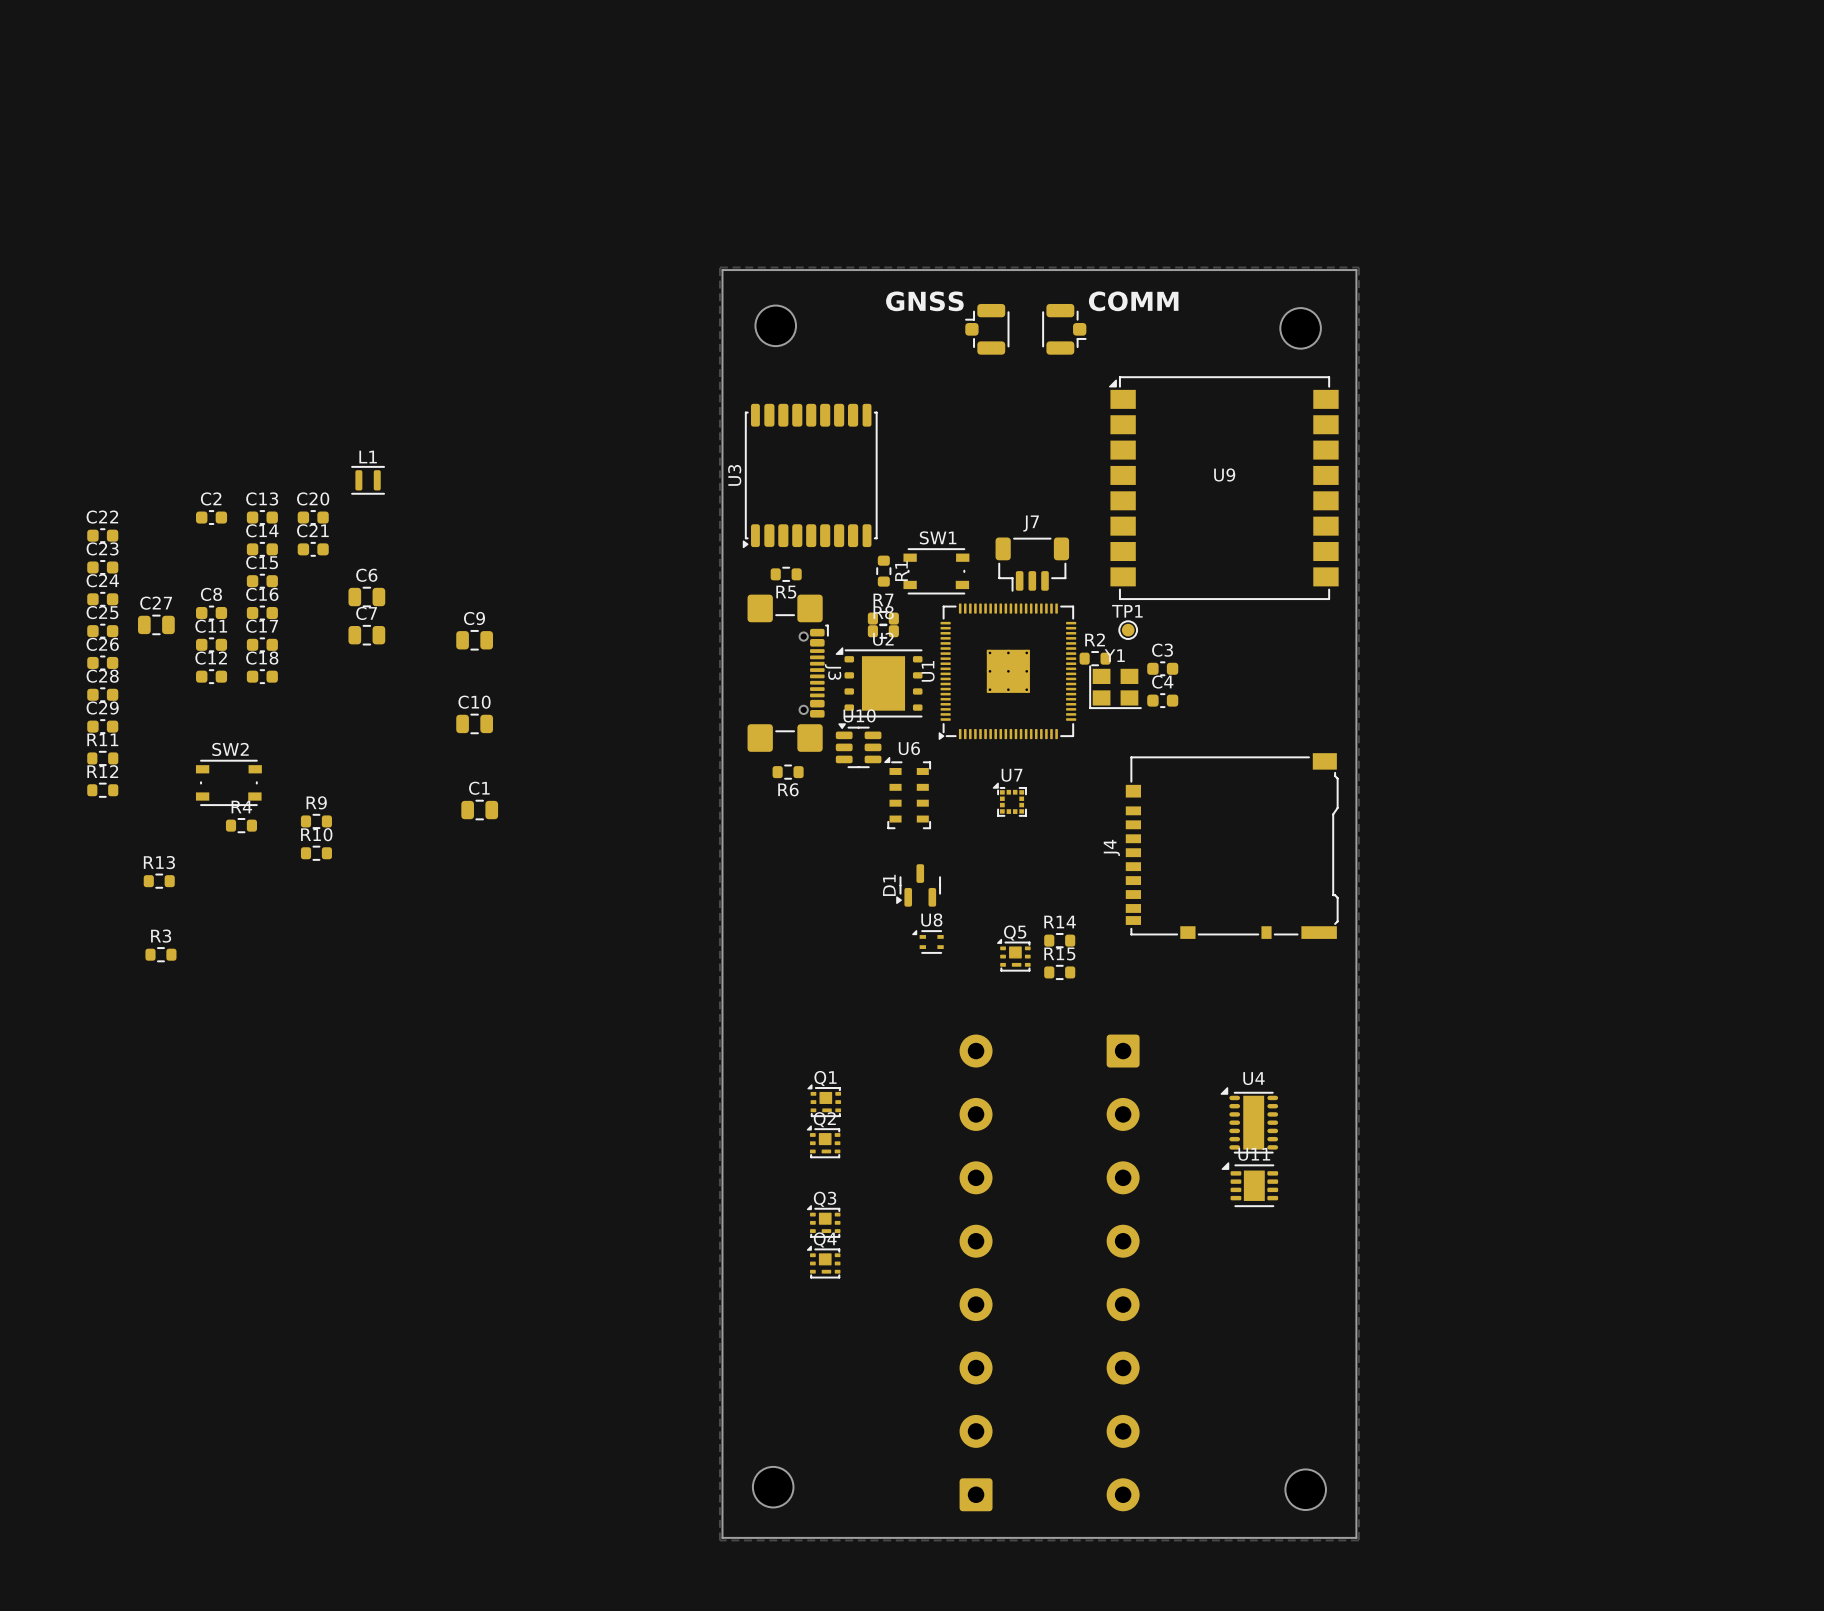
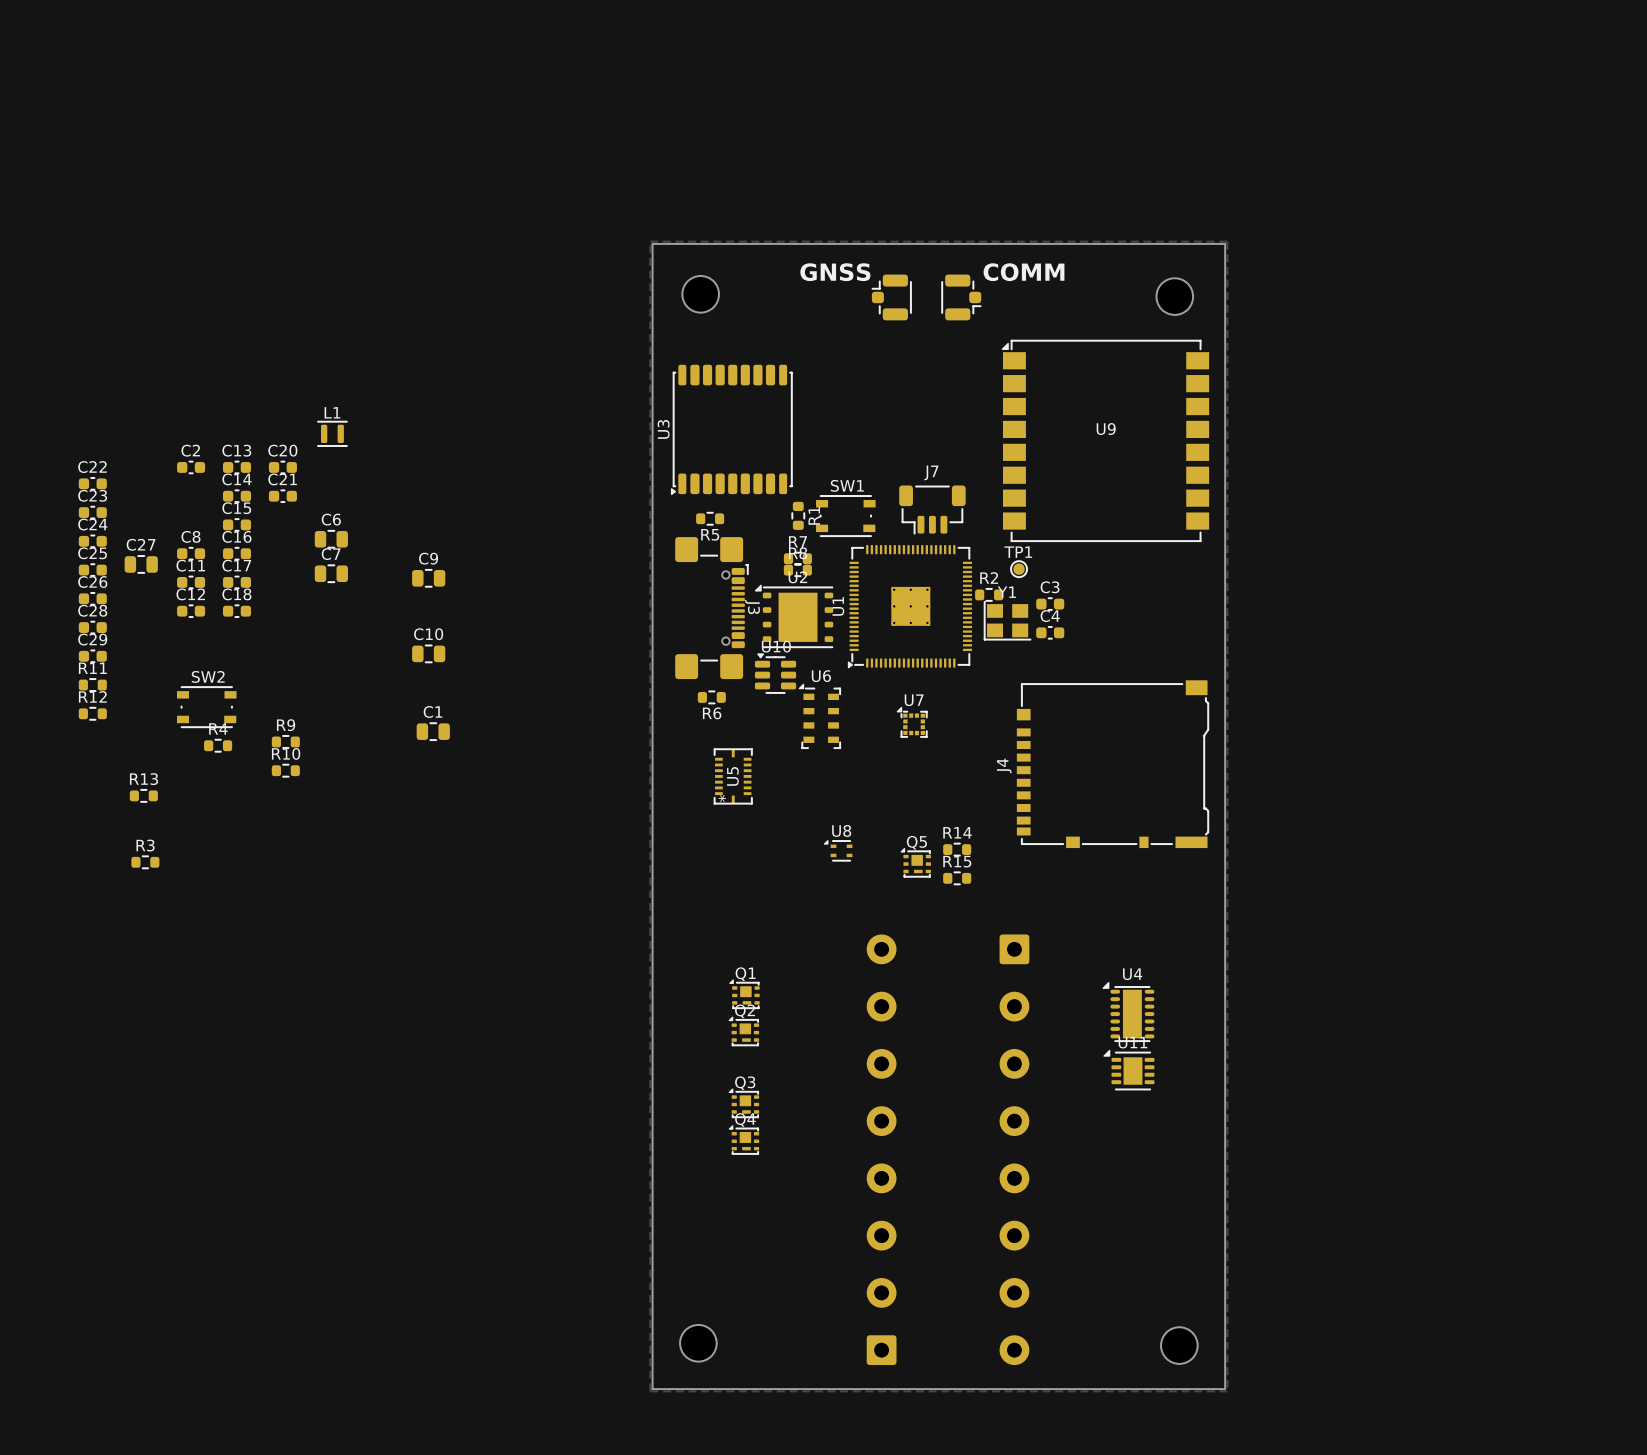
U5: none -> (733, 776)
D1: (918, 885) -> none

